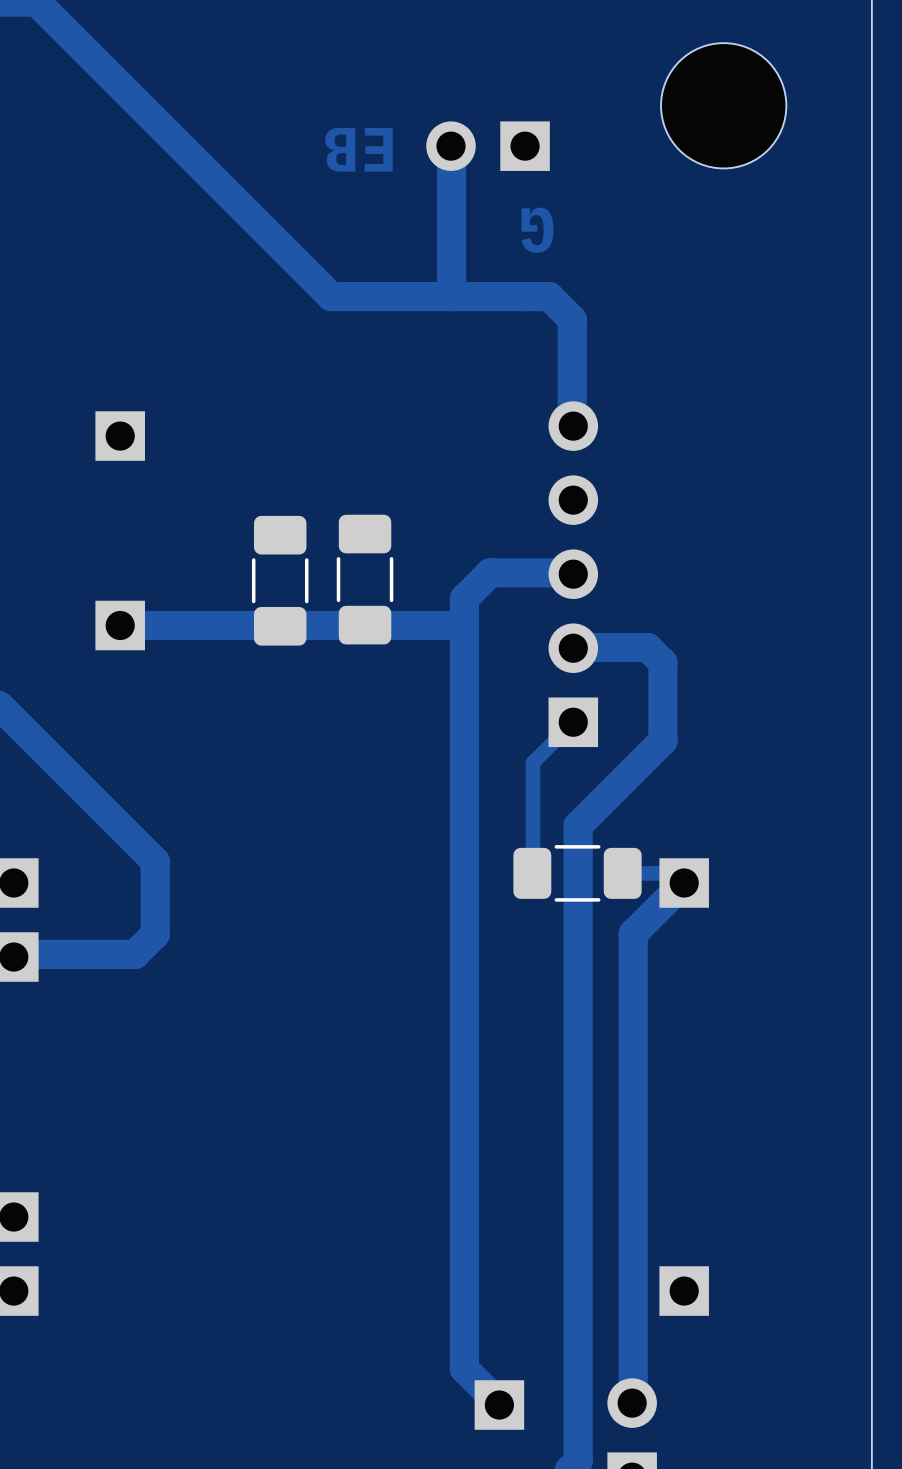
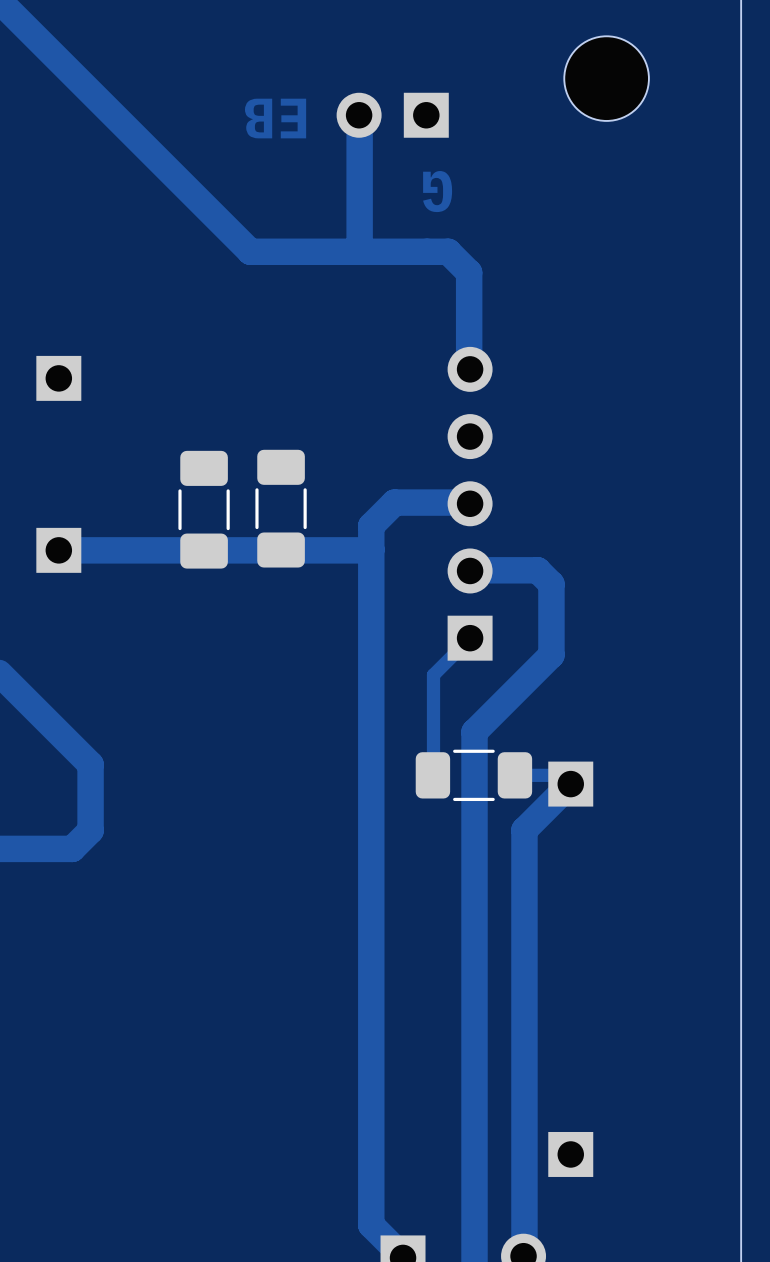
part footprint: [661, 43, 787, 169] -> [564, 36, 649, 121]

